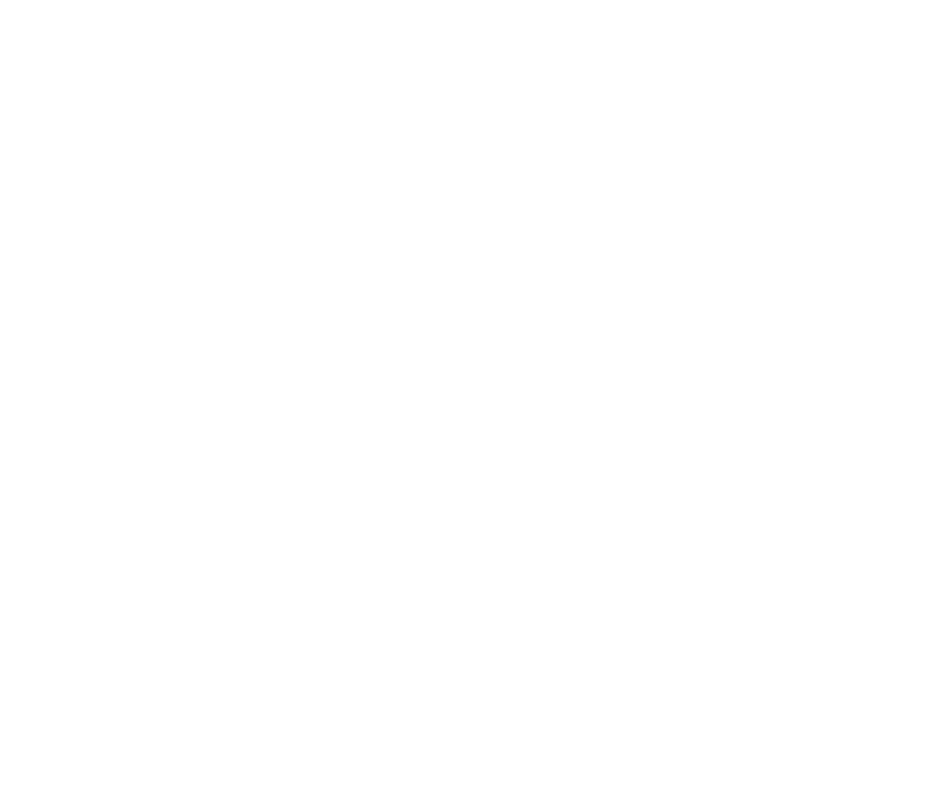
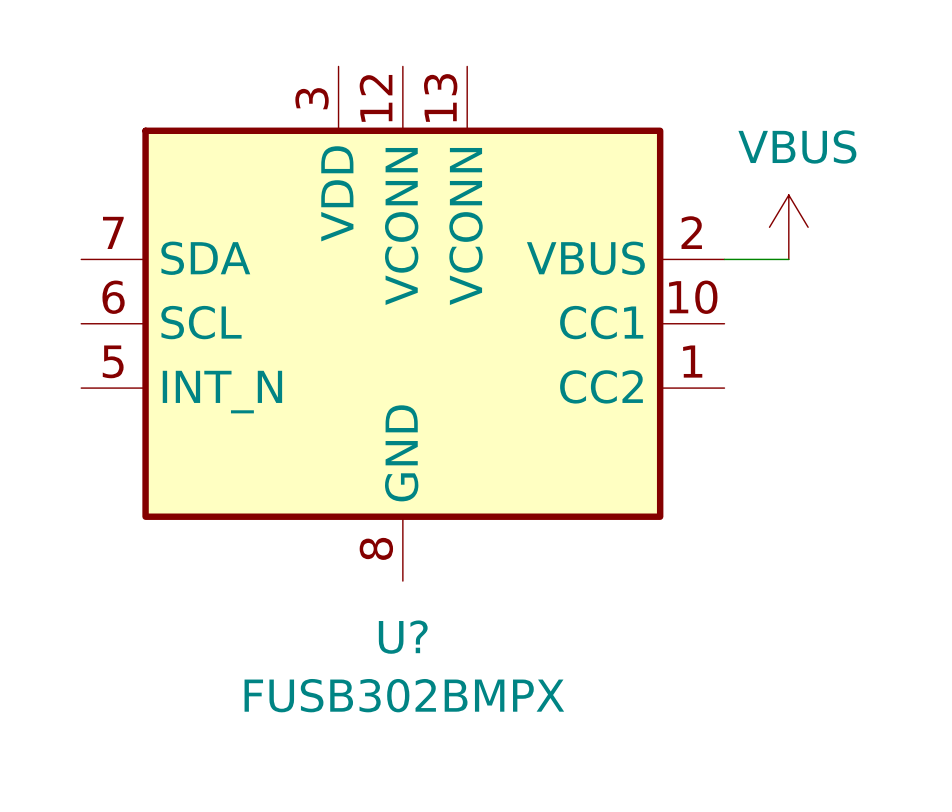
power symbol: none -> VBUS (788, 227)
wire: none -> (724, 259) (788, 259)
U?: none -> FUSB302BMPX (402, 323)

